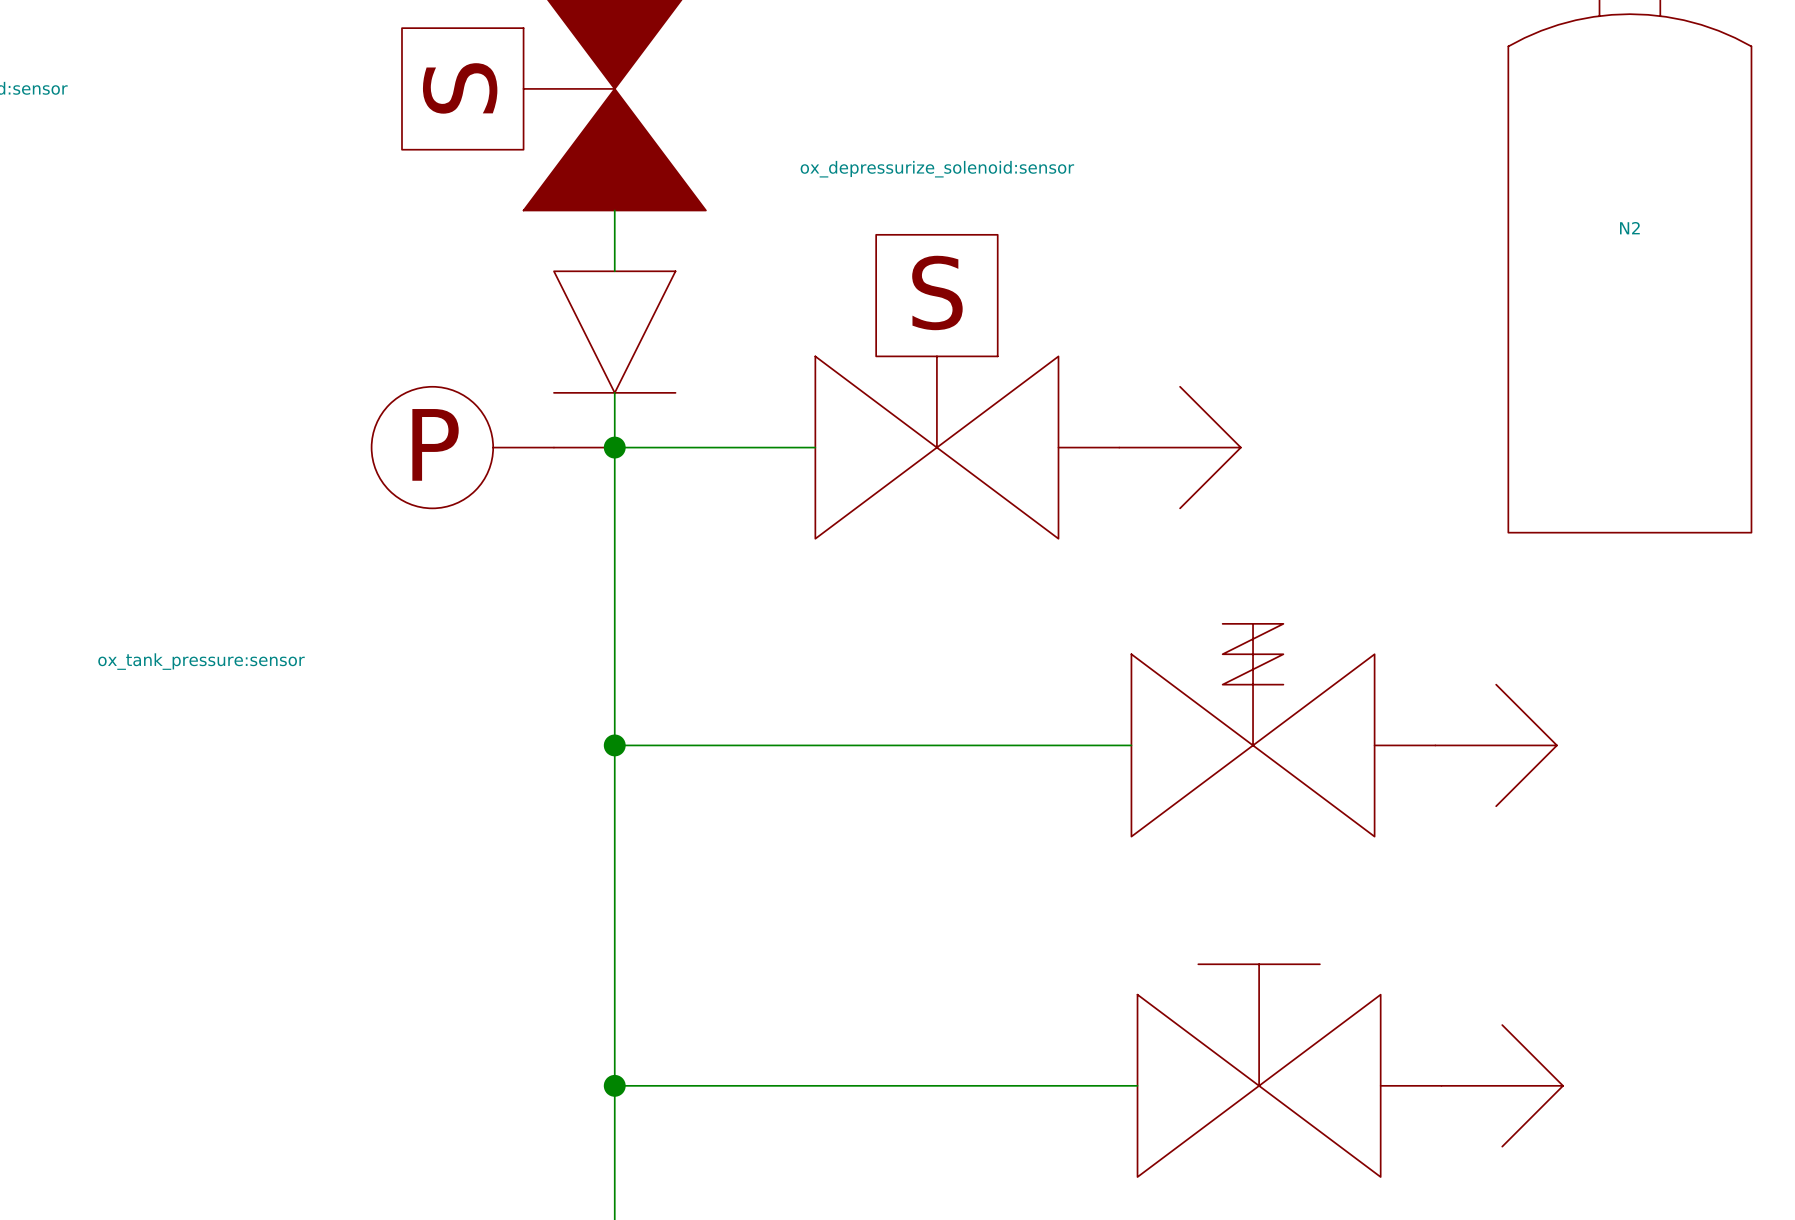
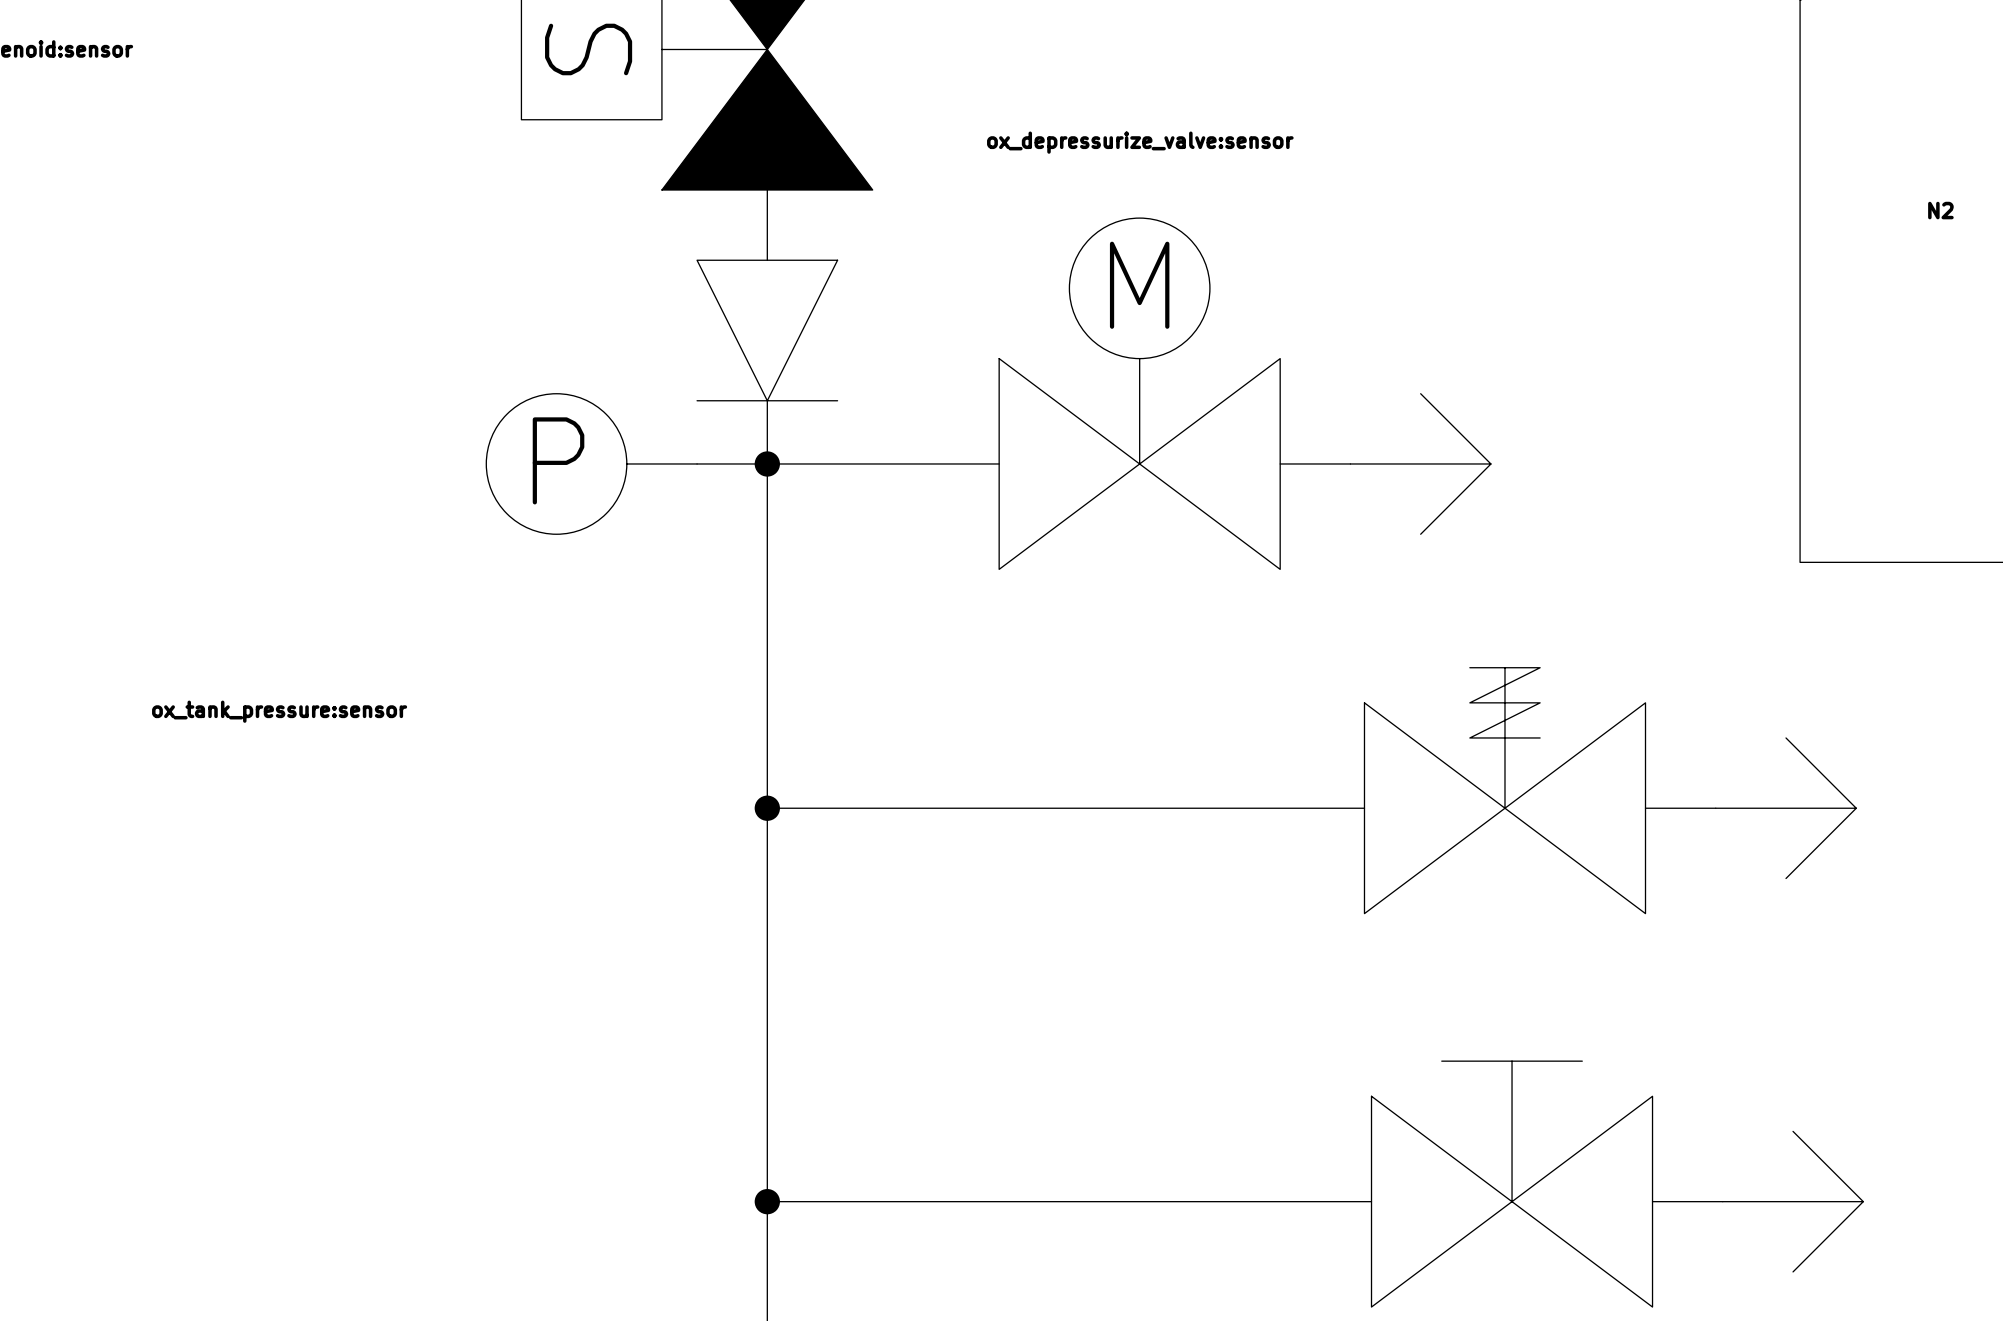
part value: ox_depressurize_solenoid:sensor (937, 169) -> ox_depressurize_valve:sensor (1140, 142)
part symbol: [815, 234, 1059, 539] -> [999, 218, 1281, 570]

